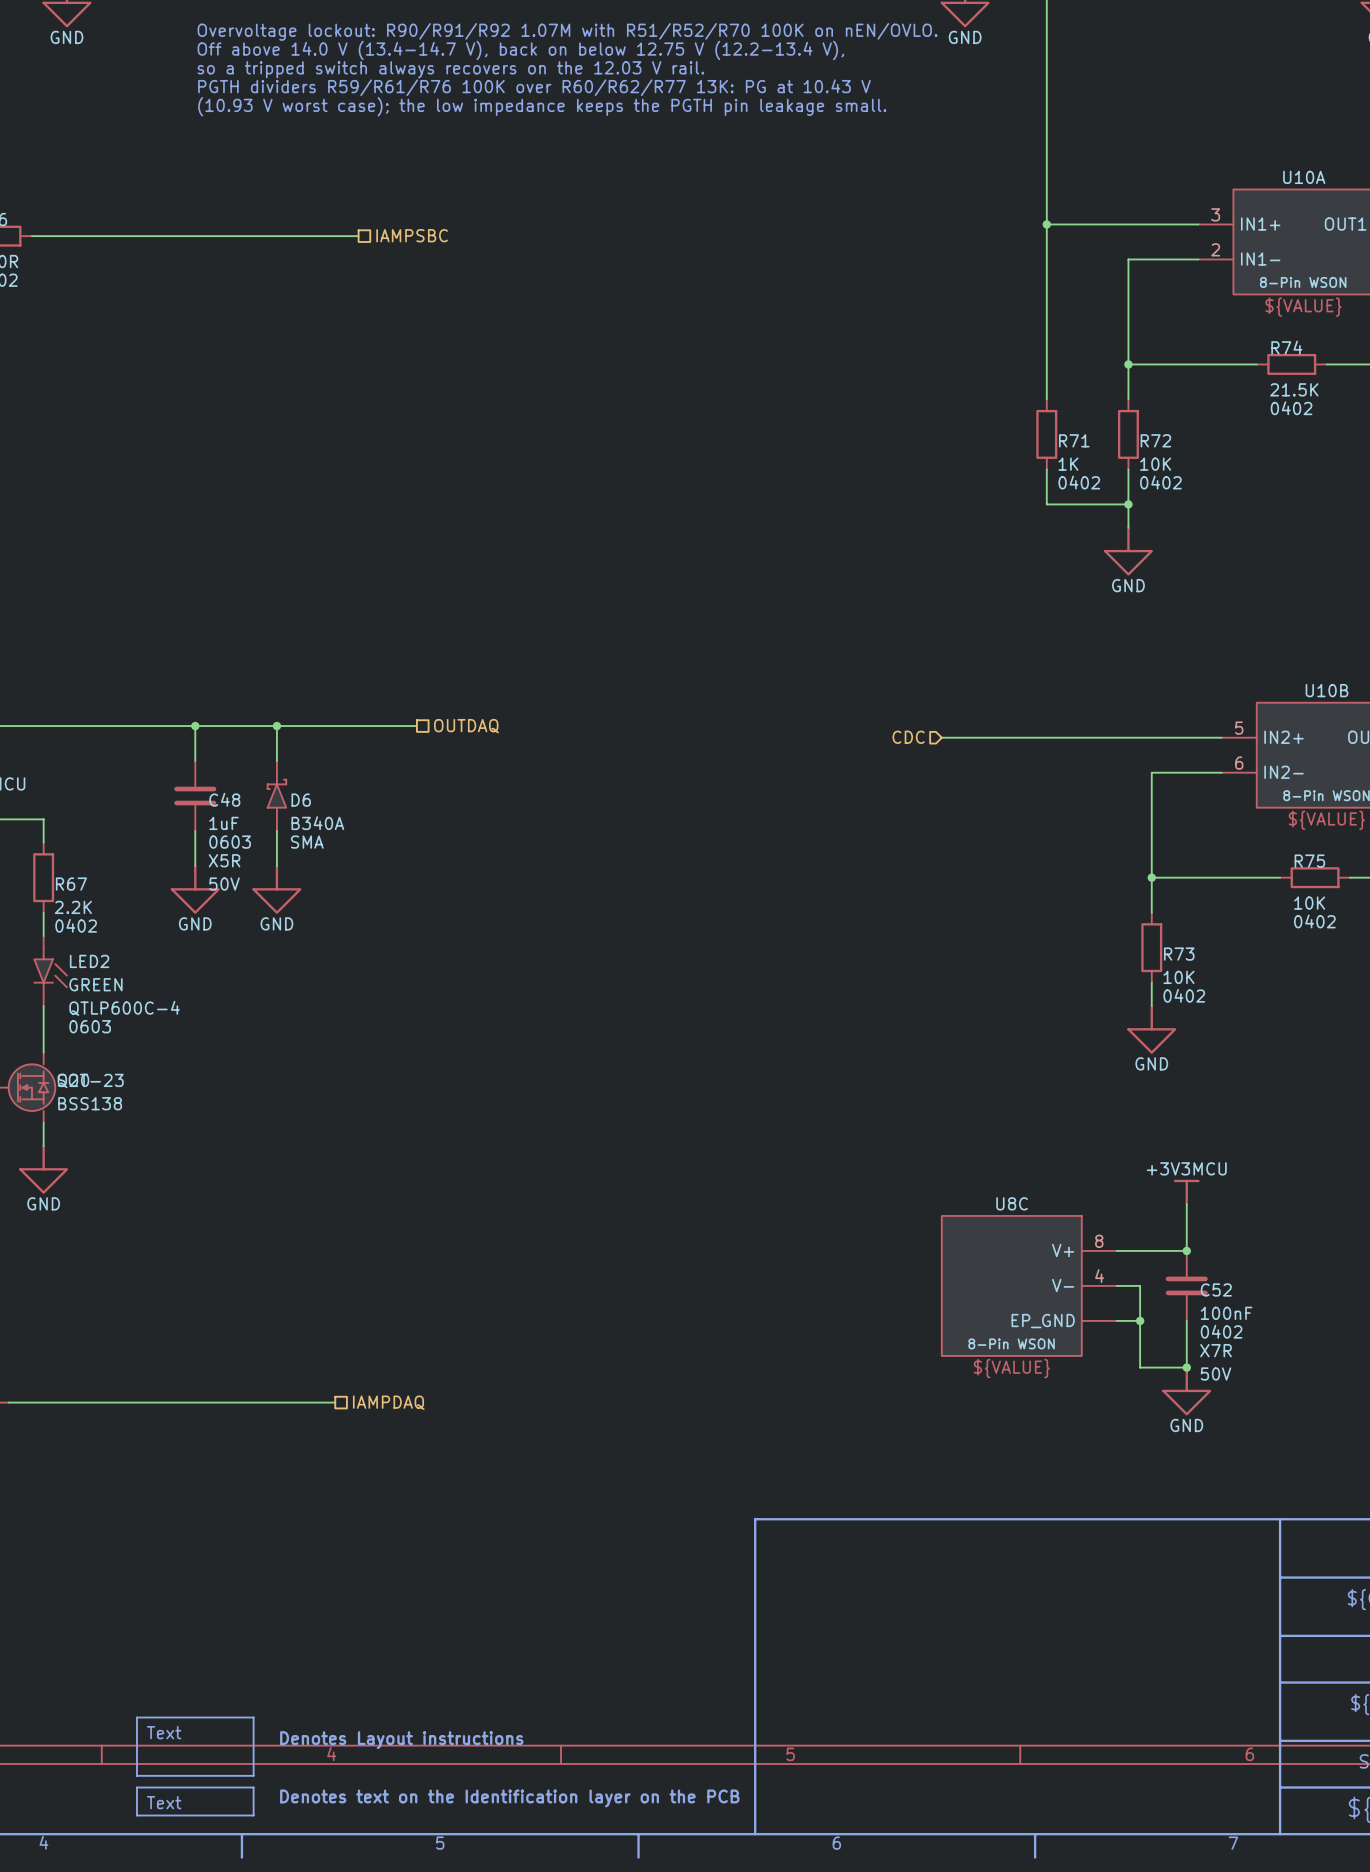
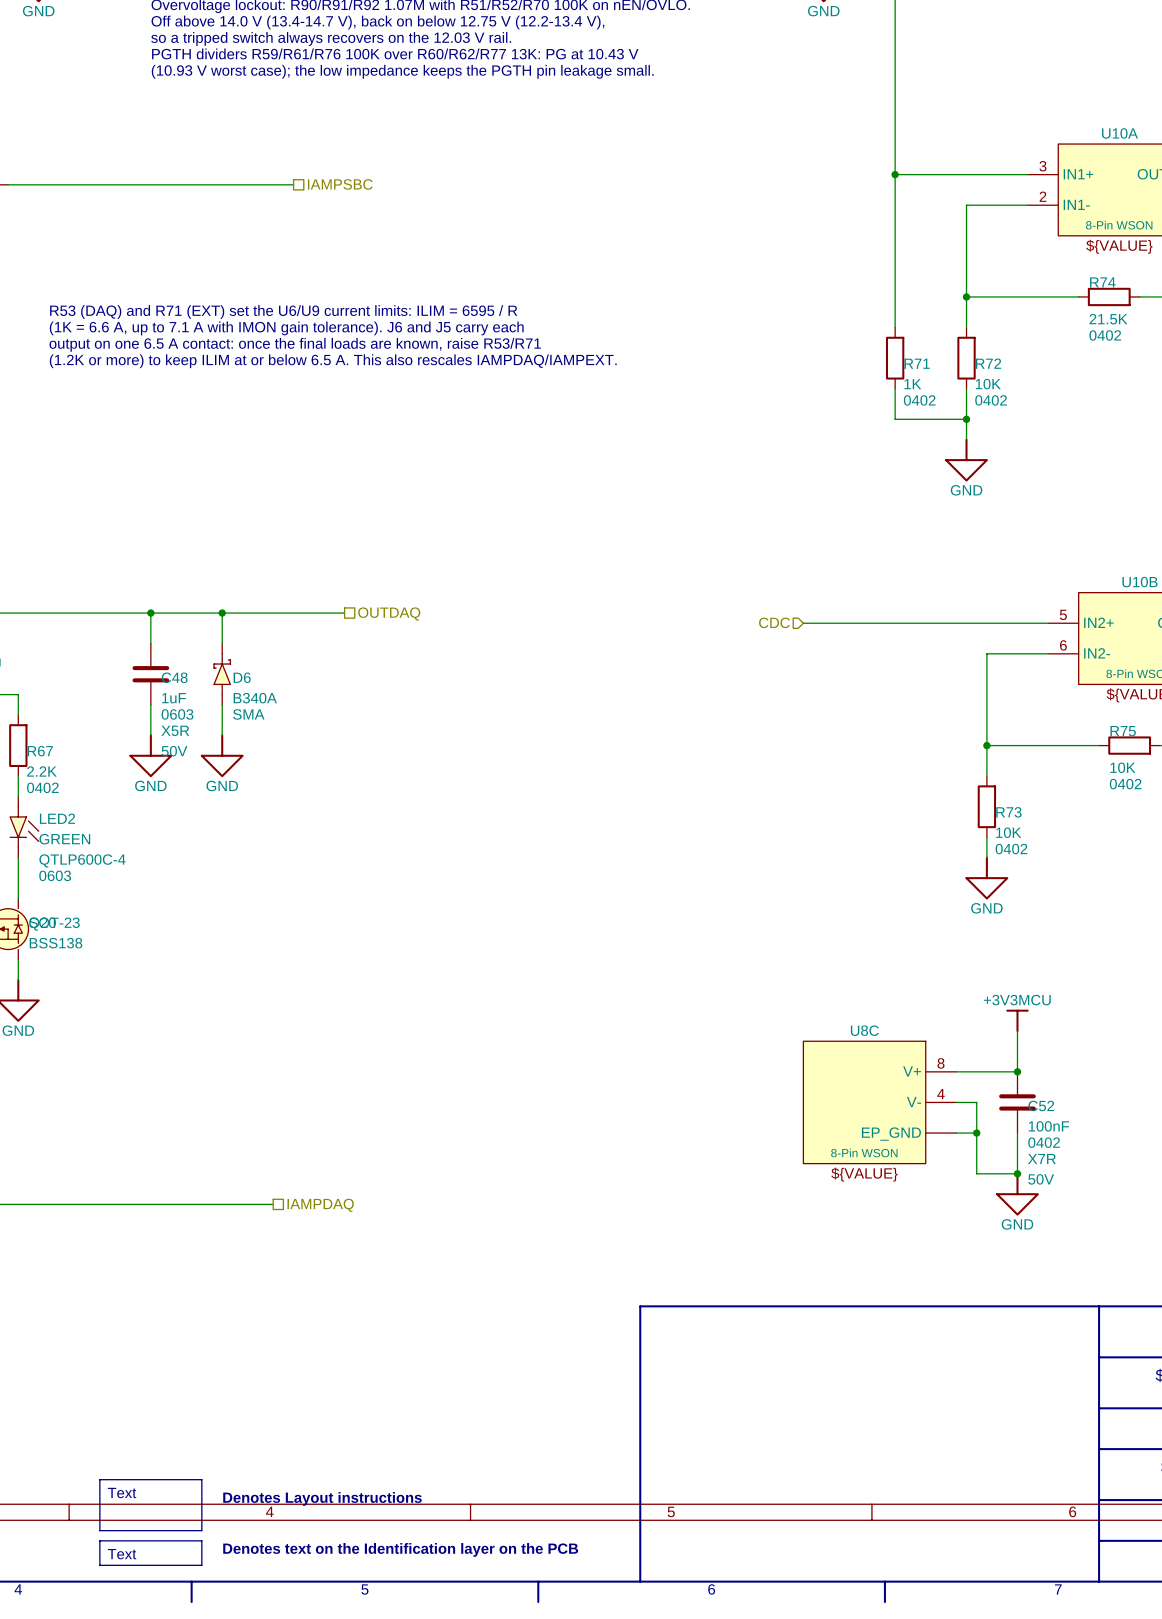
text: none -> R53 (DAQ) and R71 (EXT) set the U6/U9 current limits: ILIM = 6595 / R (283, 312)
text: none -> (1K = 6.6 A, up to 7.1 A with IMON gain tolerance). J6 and J5 carry each (286, 328)
text: none -> output on one 6.5 A contact: once the final loads are known, raise R53/R71 (295, 344)
text: none -> (1.2K or more) to keep ILIM at or below 6.5 A. This also rescales IAMPDAQ/IAMPEXT. (333, 361)

